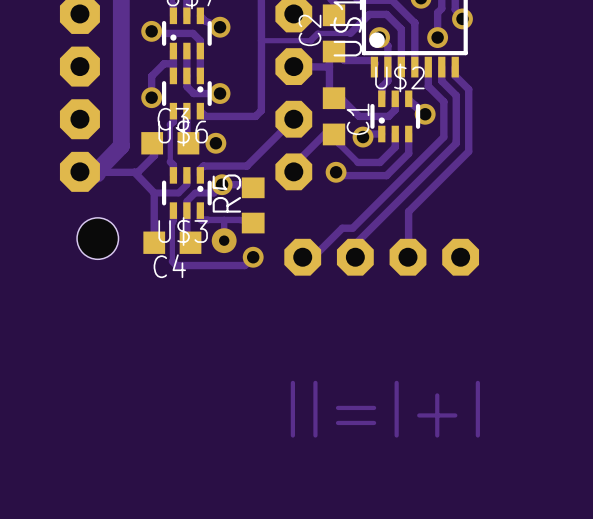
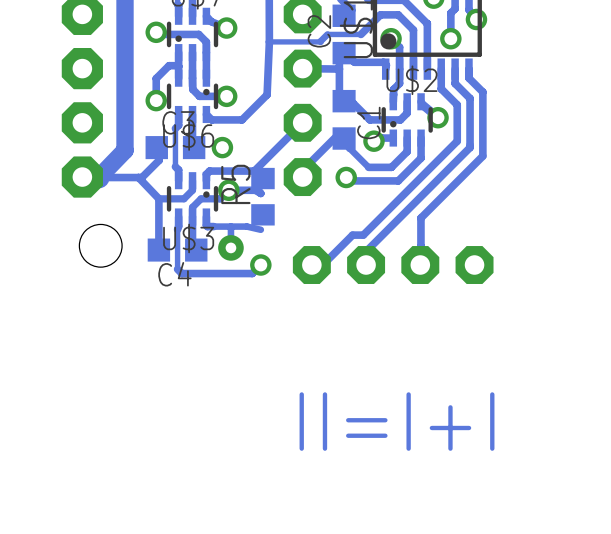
track: (261, 40) (261, 110) (255, 116) (234, 116) -> (269, 41) (267, 94) (242, 119)
R5 position: (253, 205) -> (262, 196)

